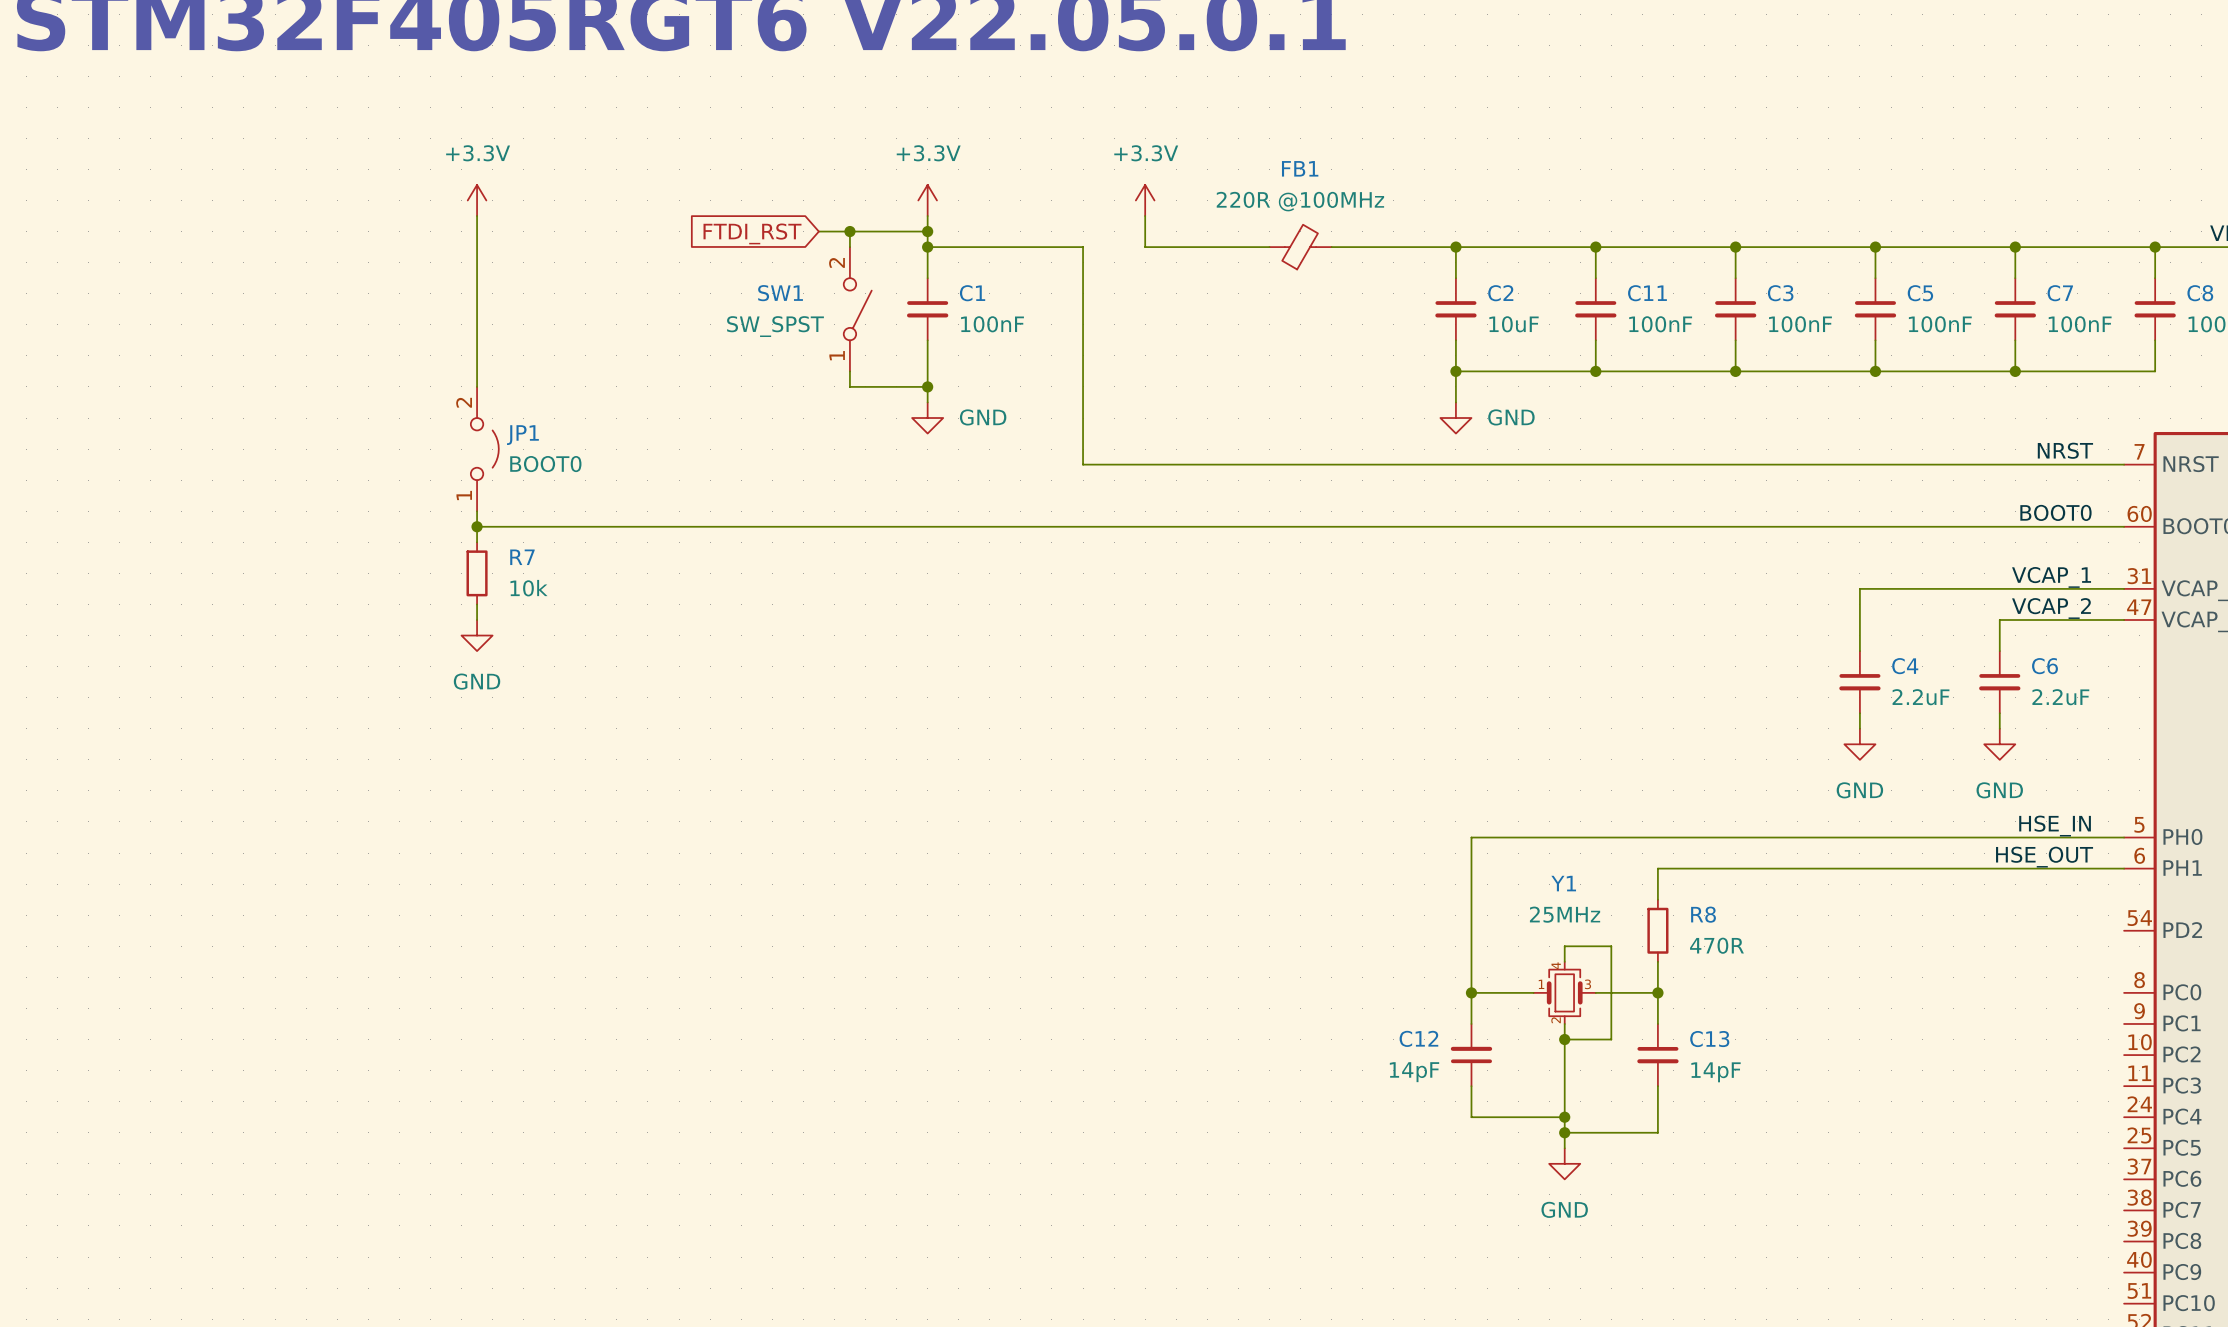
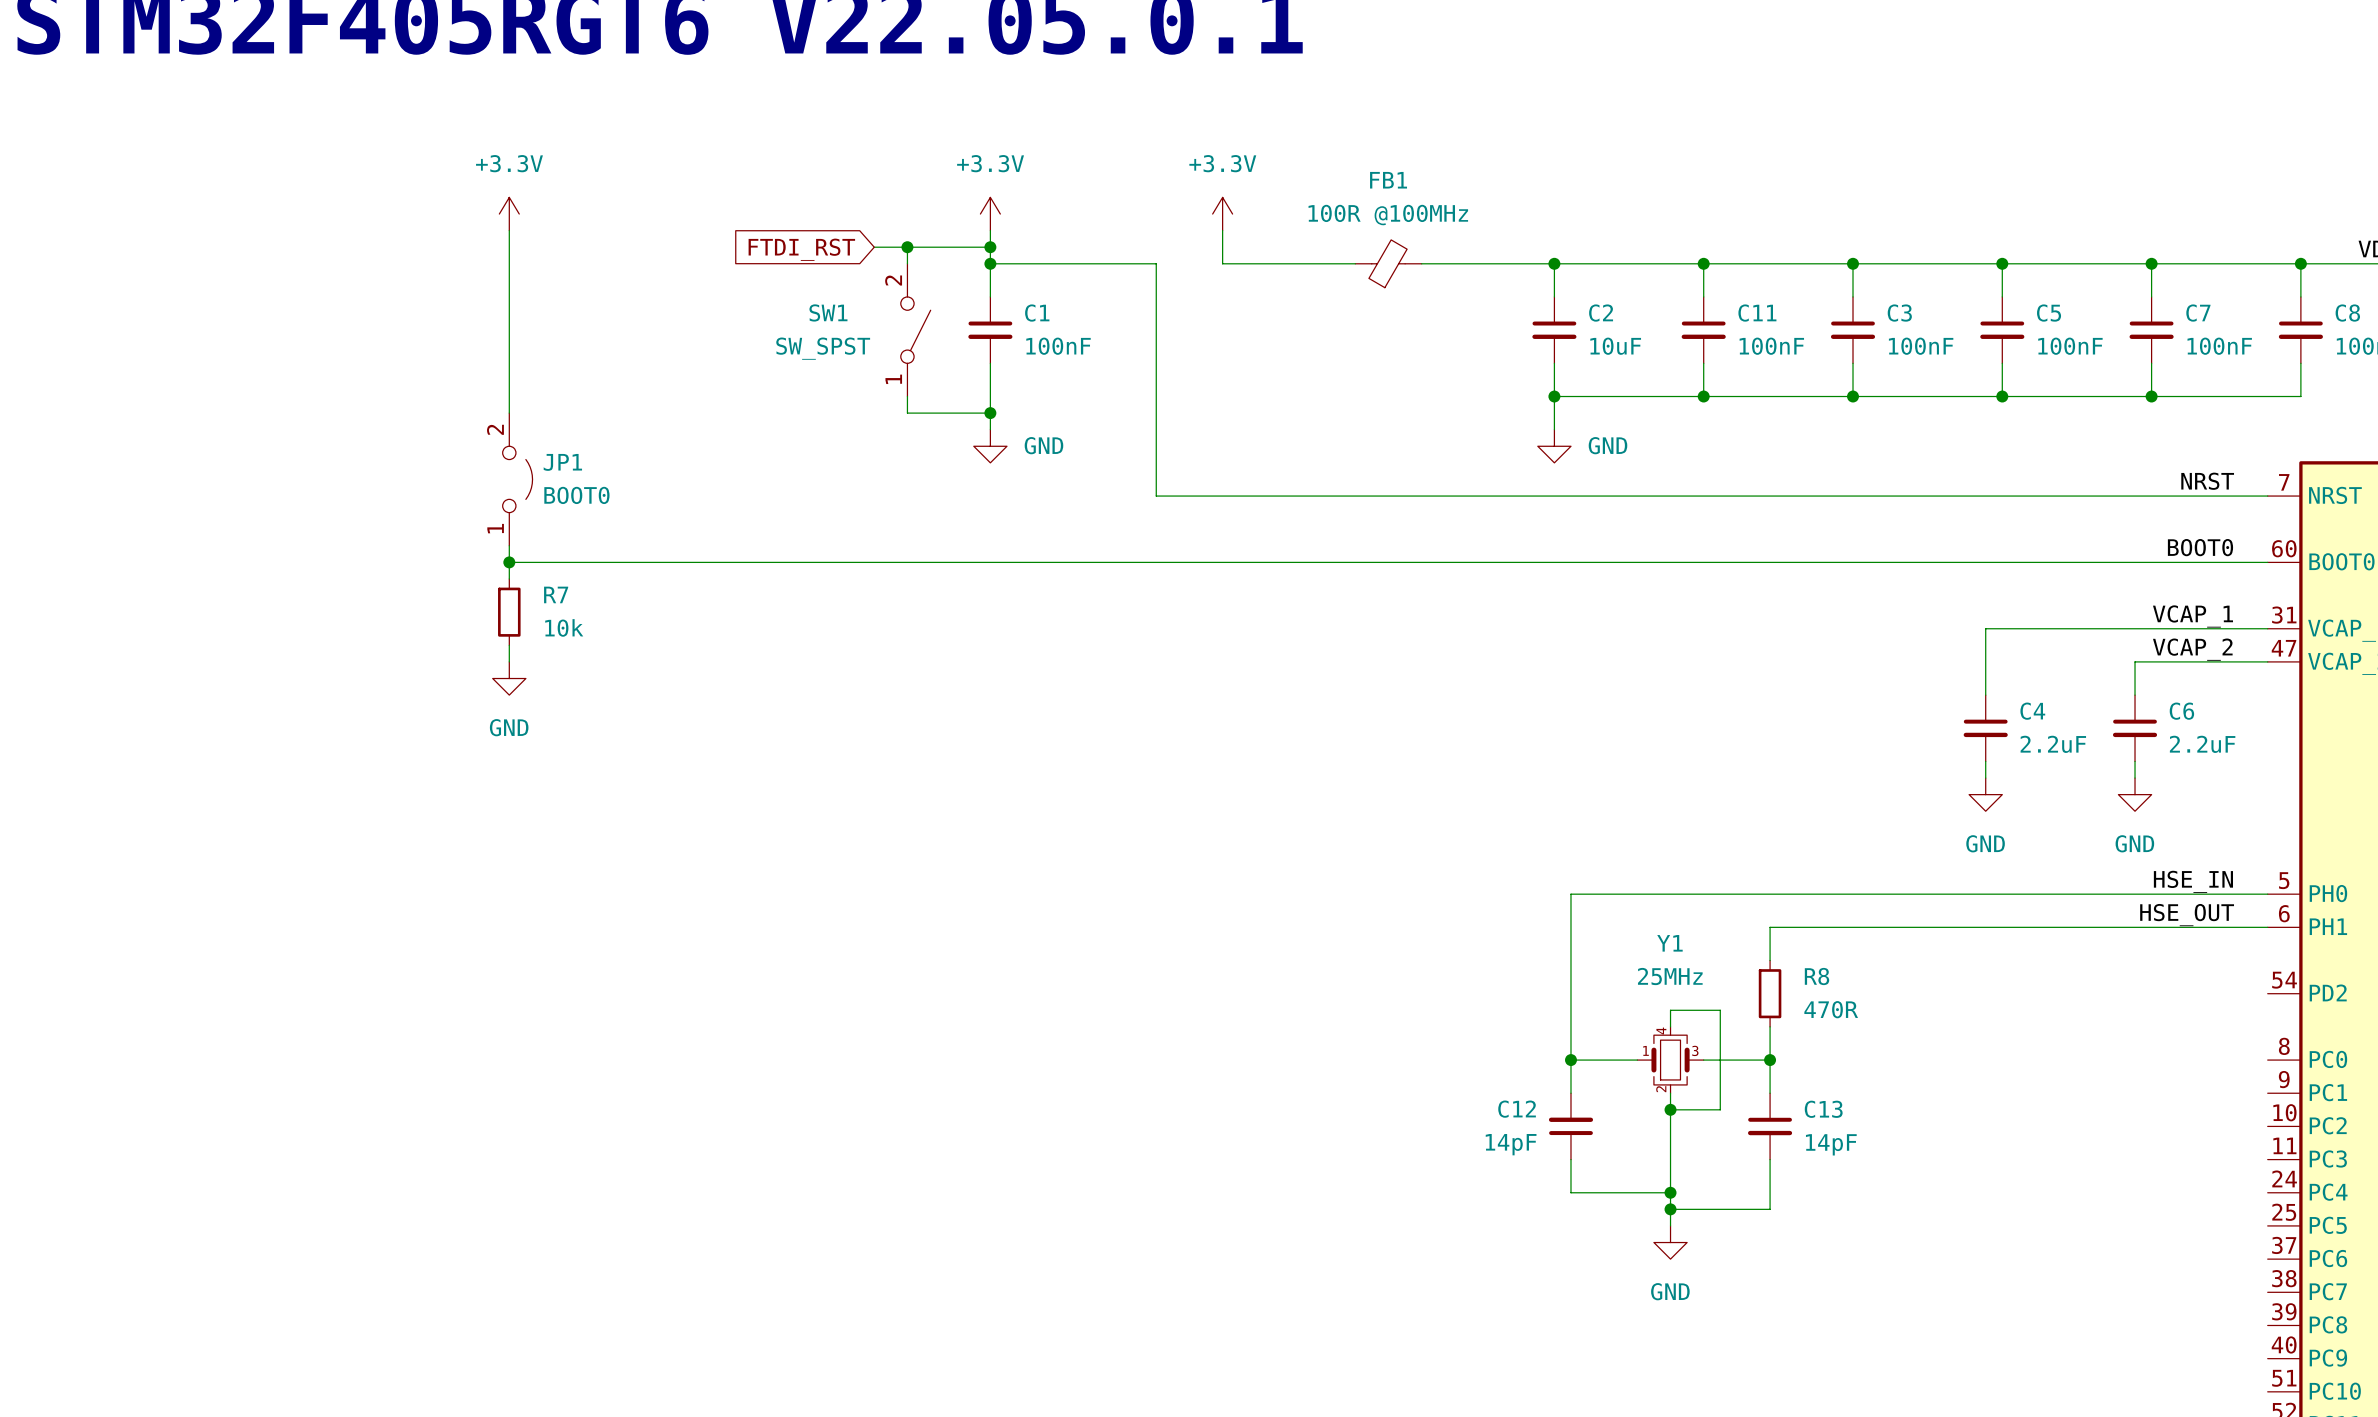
FB1 value: 220R @100MHz (1300, 201) -> 100R @100MHz (1388, 215)

